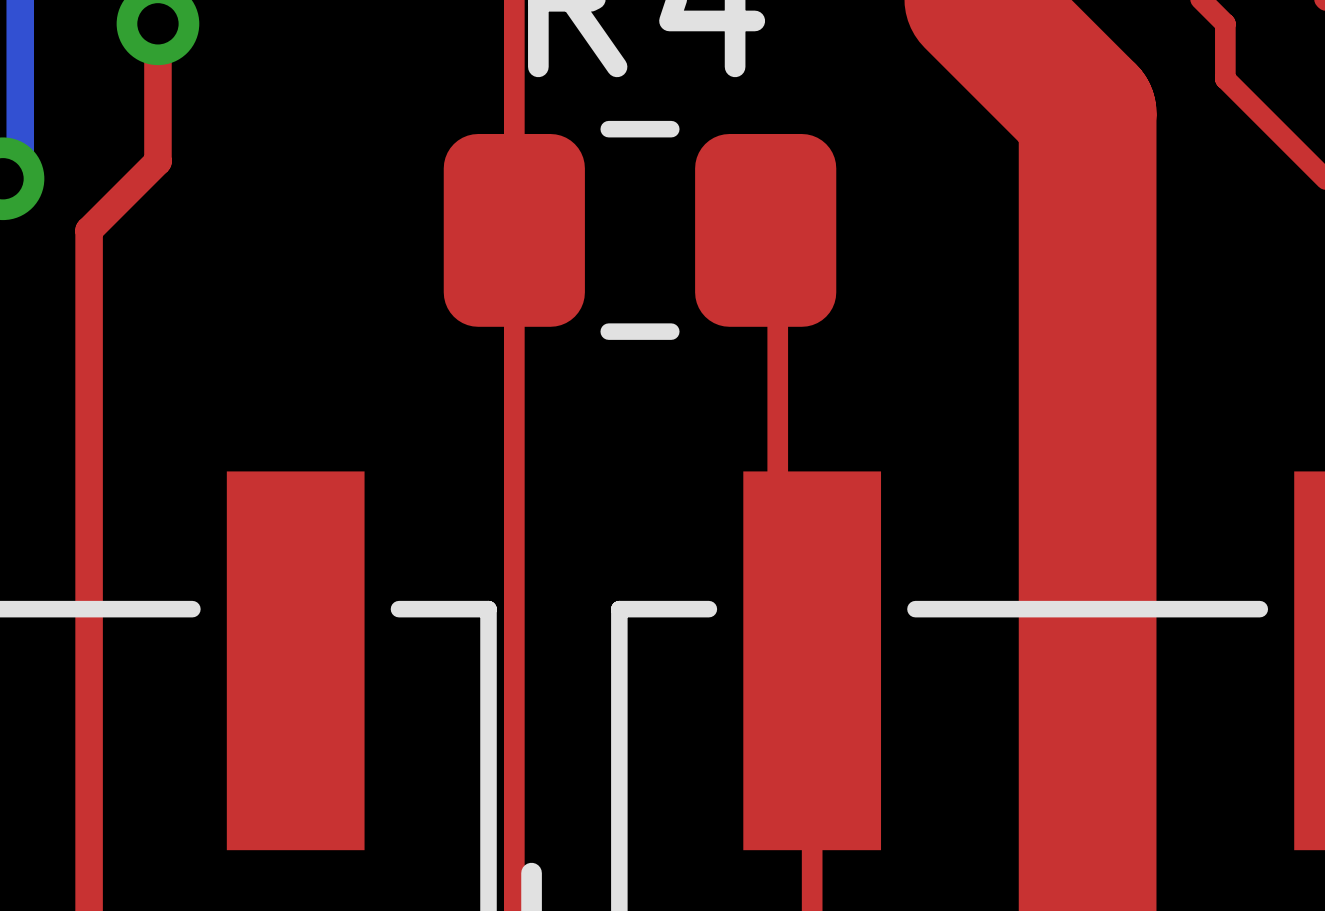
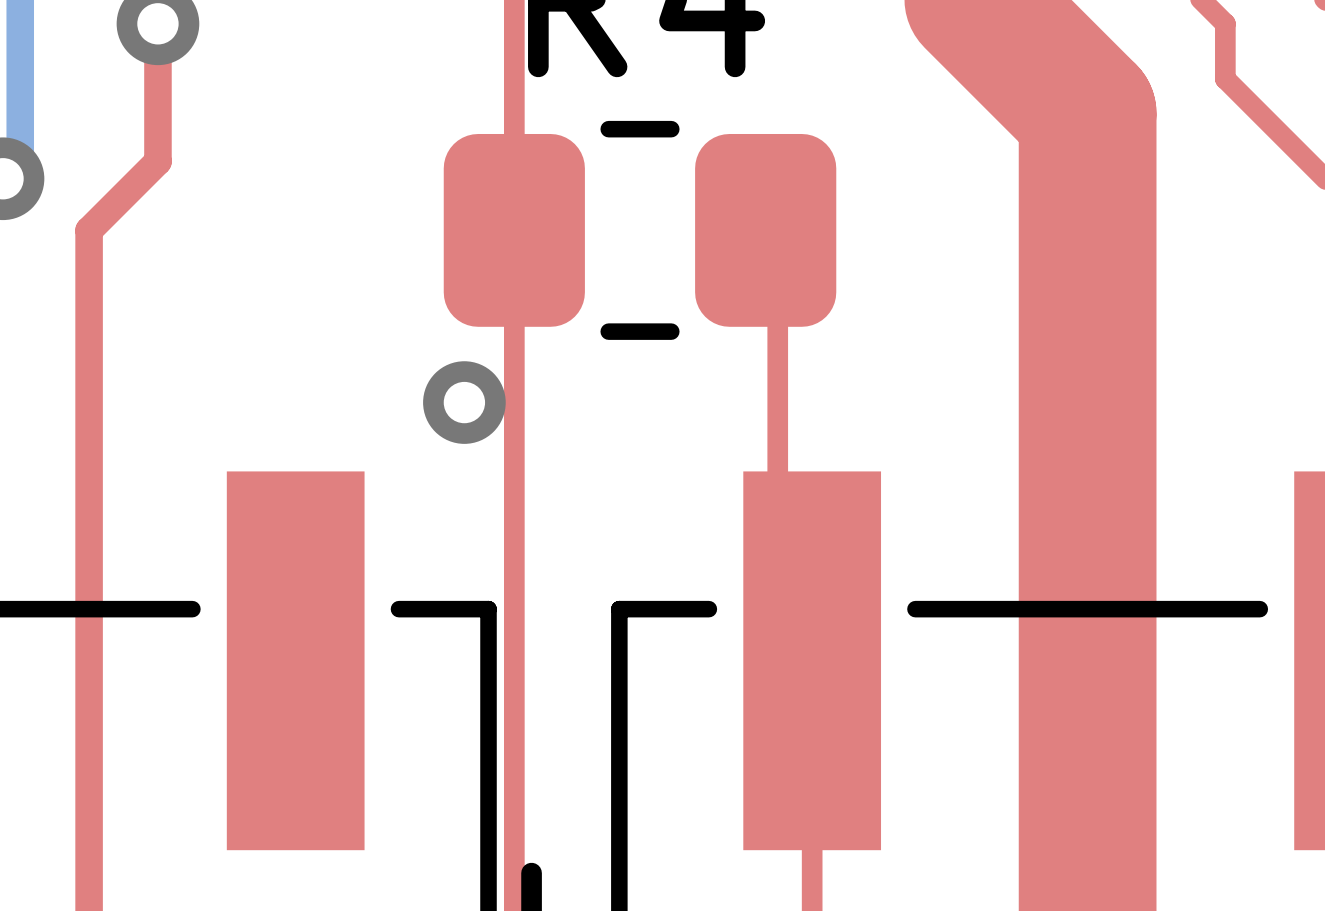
via: none -> (464, 402)

